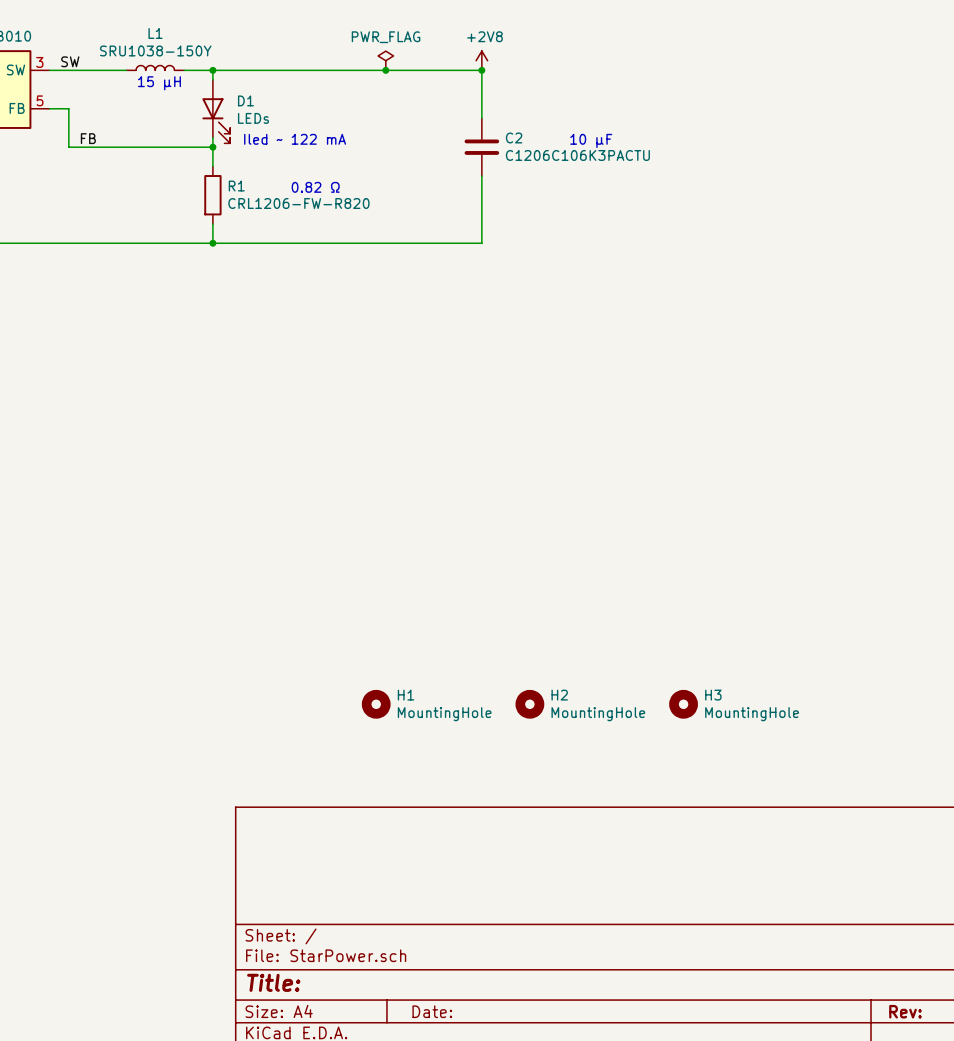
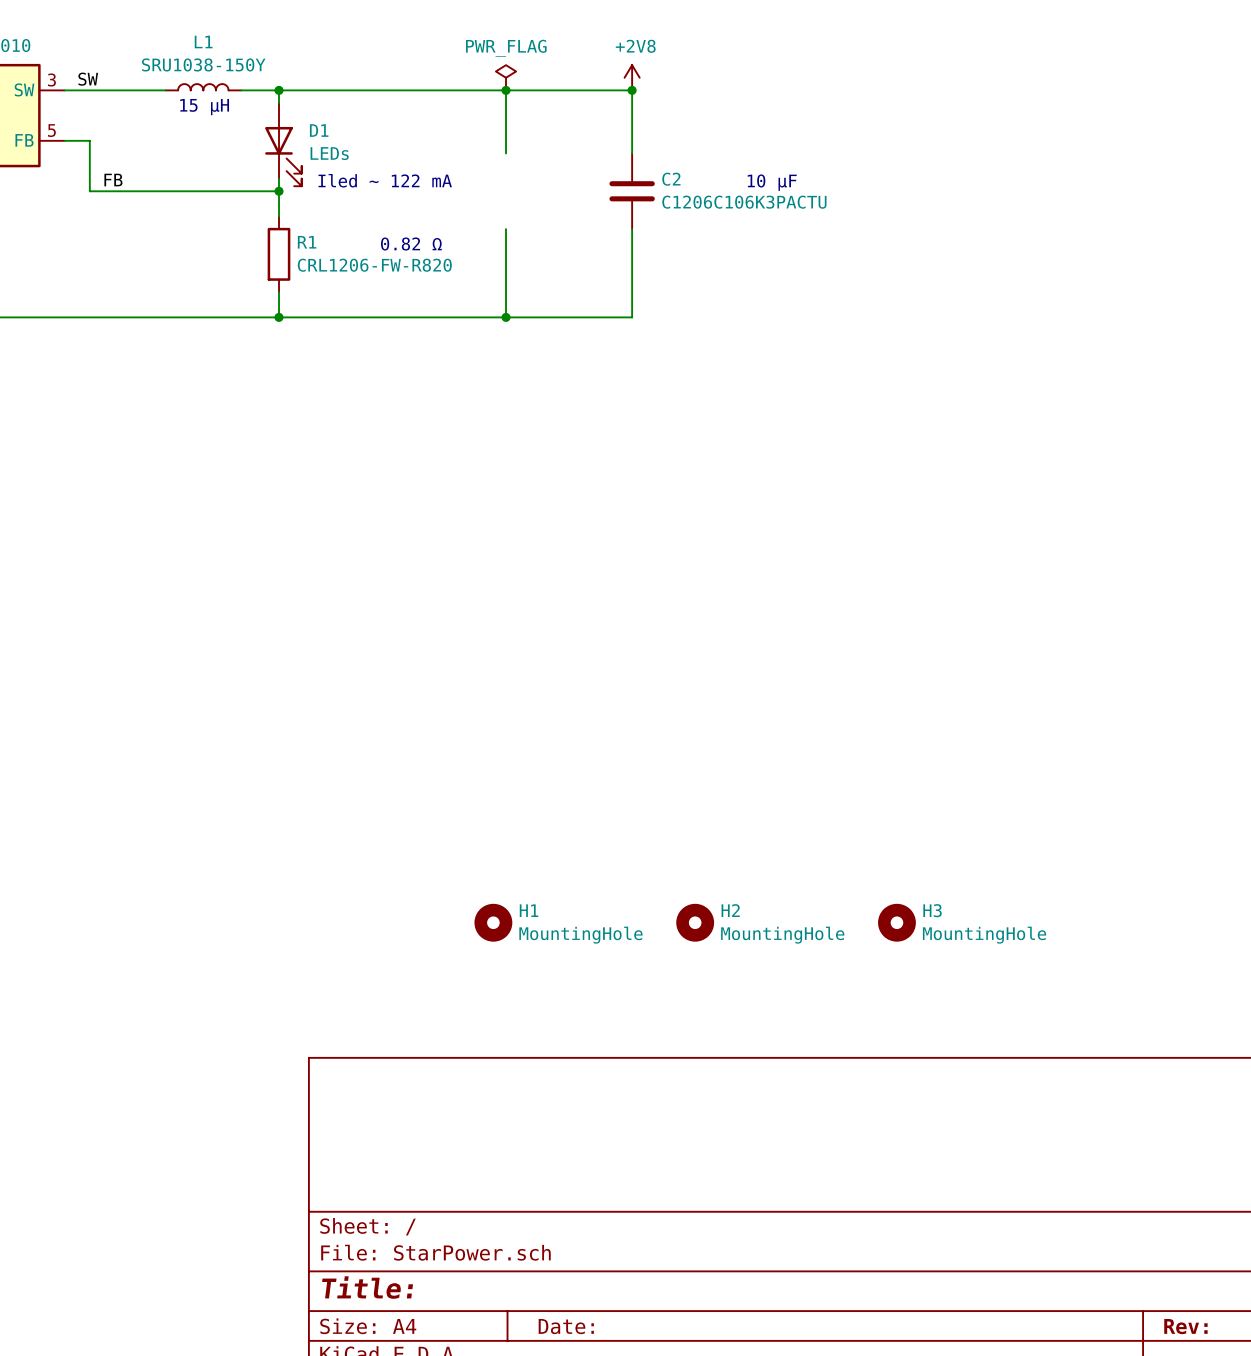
wire: none -> (506, 90) (506, 153)
wire: none -> (506, 229) (506, 317)
junction: none -> (506, 317)

